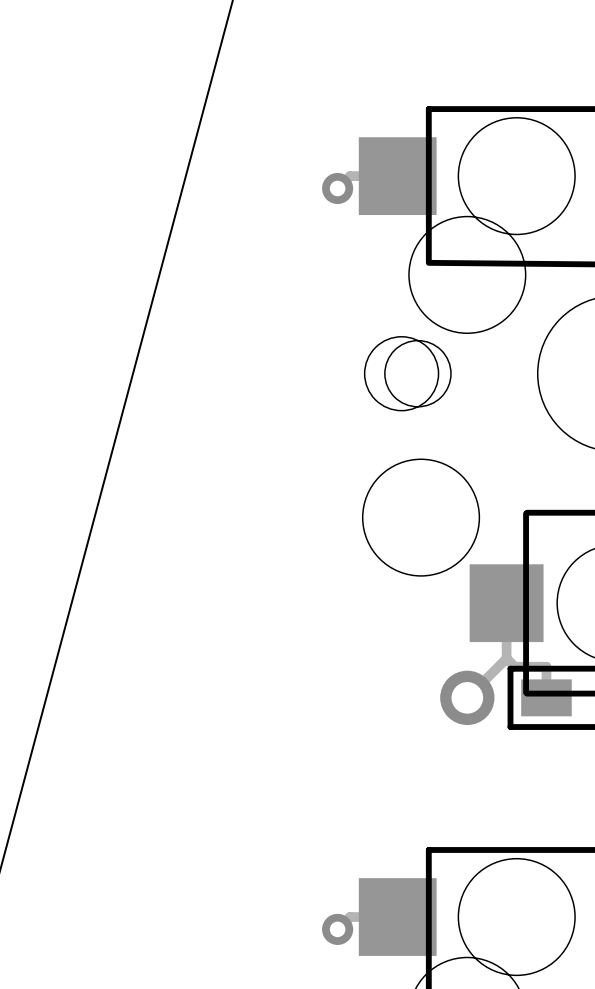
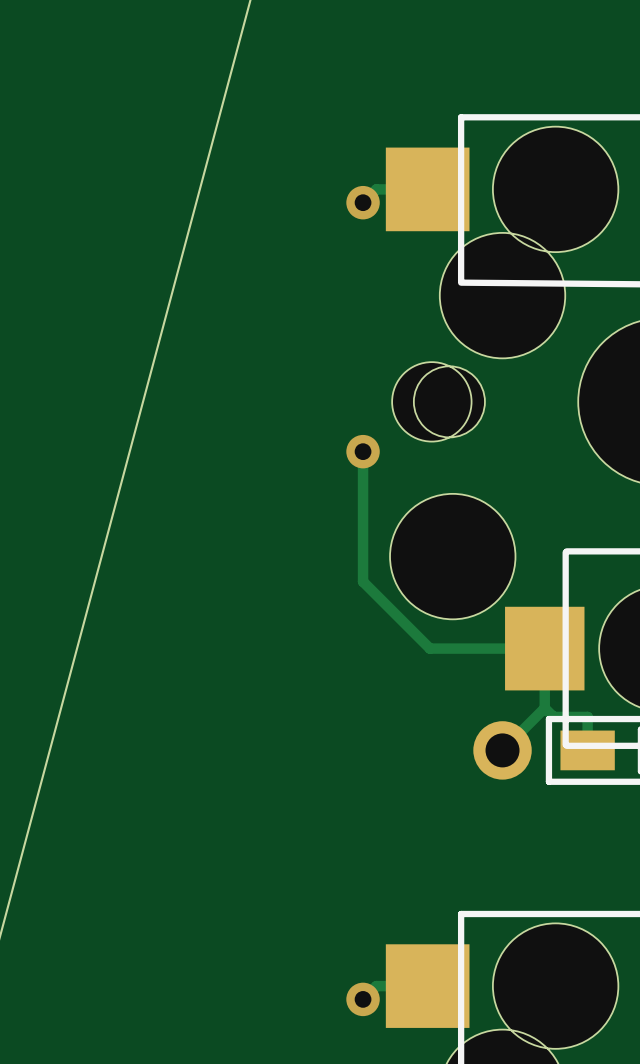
track: none -> (363, 451) (363, 581) (429, 648) (544, 648)
via: none -> (363, 451)

